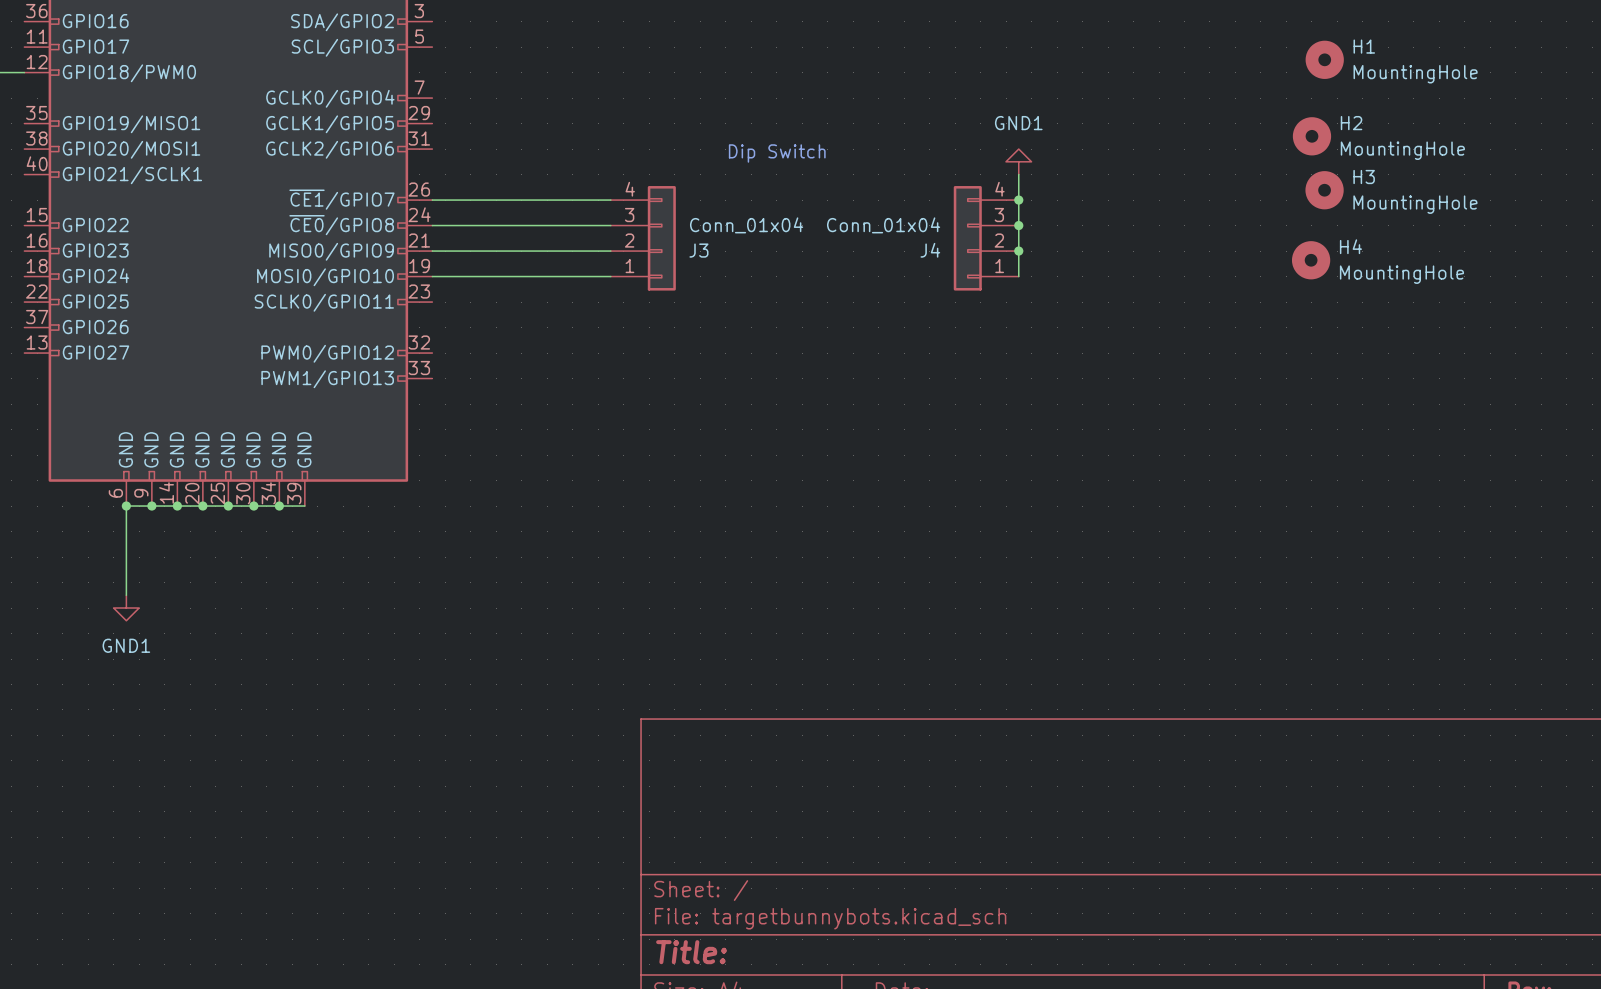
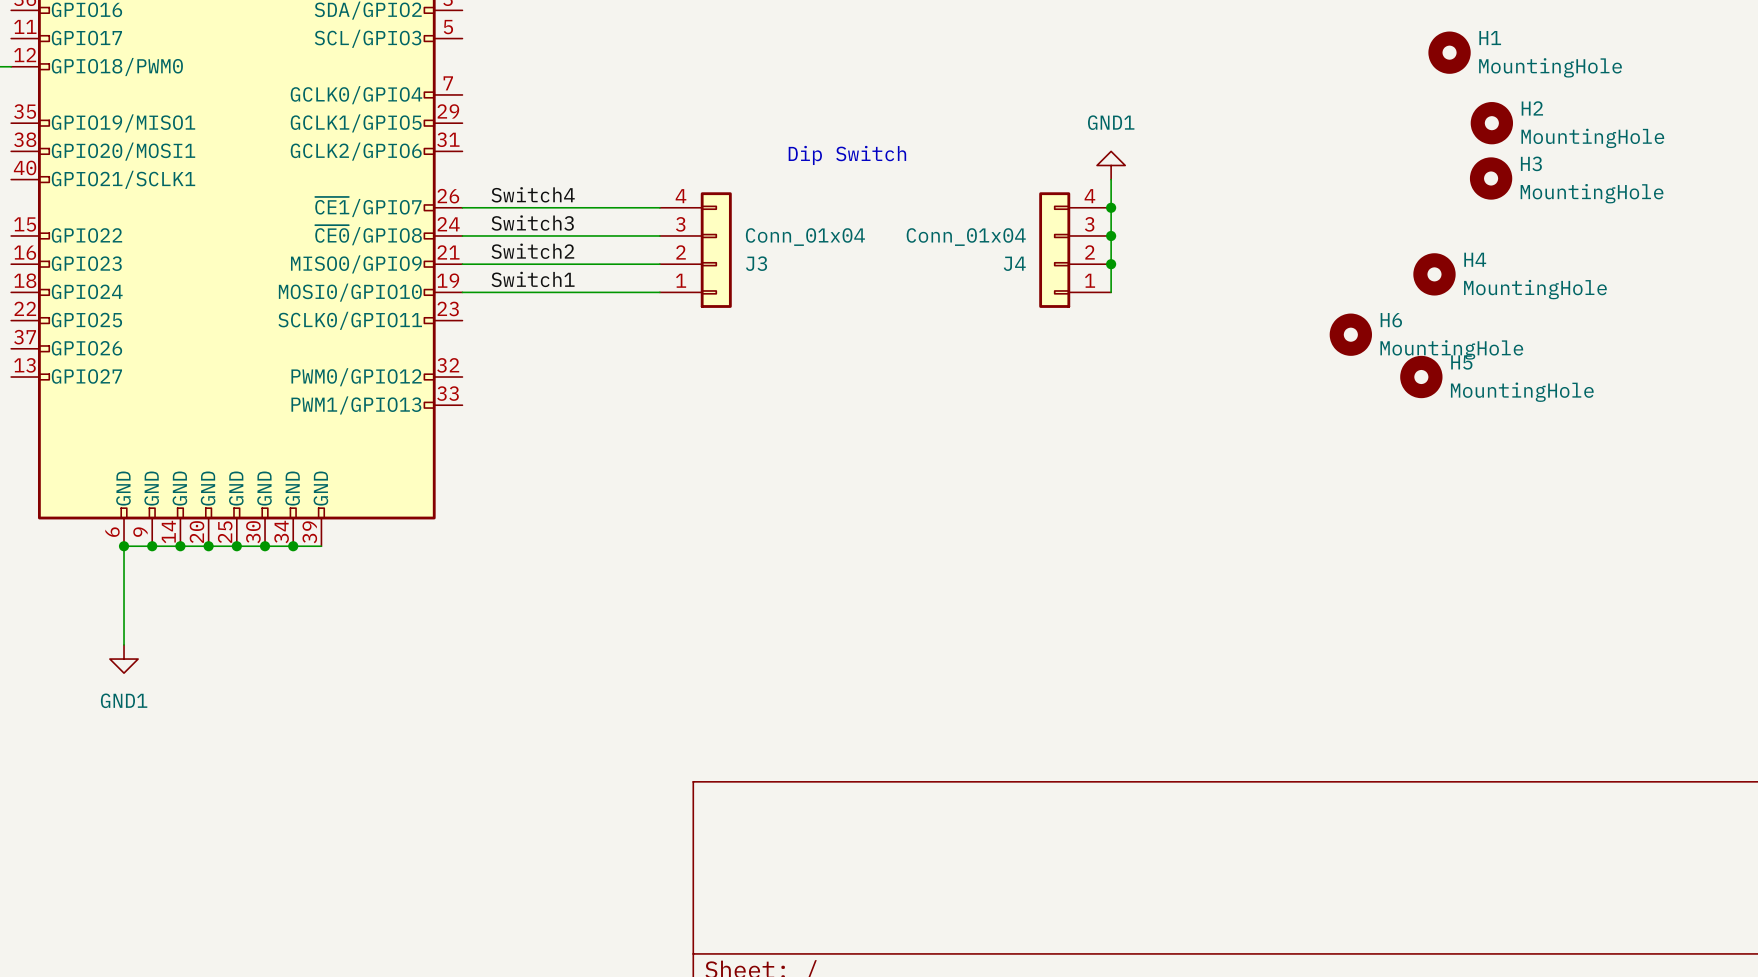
H2 position: (1311, 136) -> (1491, 123)
label: none -> Switch4 (533, 194)
H3 position: (1324, 190) -> (1491, 178)
label: none -> Switch3 (532, 223)
label: none -> Switch2 (532, 251)
label: none -> Switch1 (533, 279)
H6: none -> MountingHole (1350, 334)
H5: none -> MountingHole (1421, 377)

